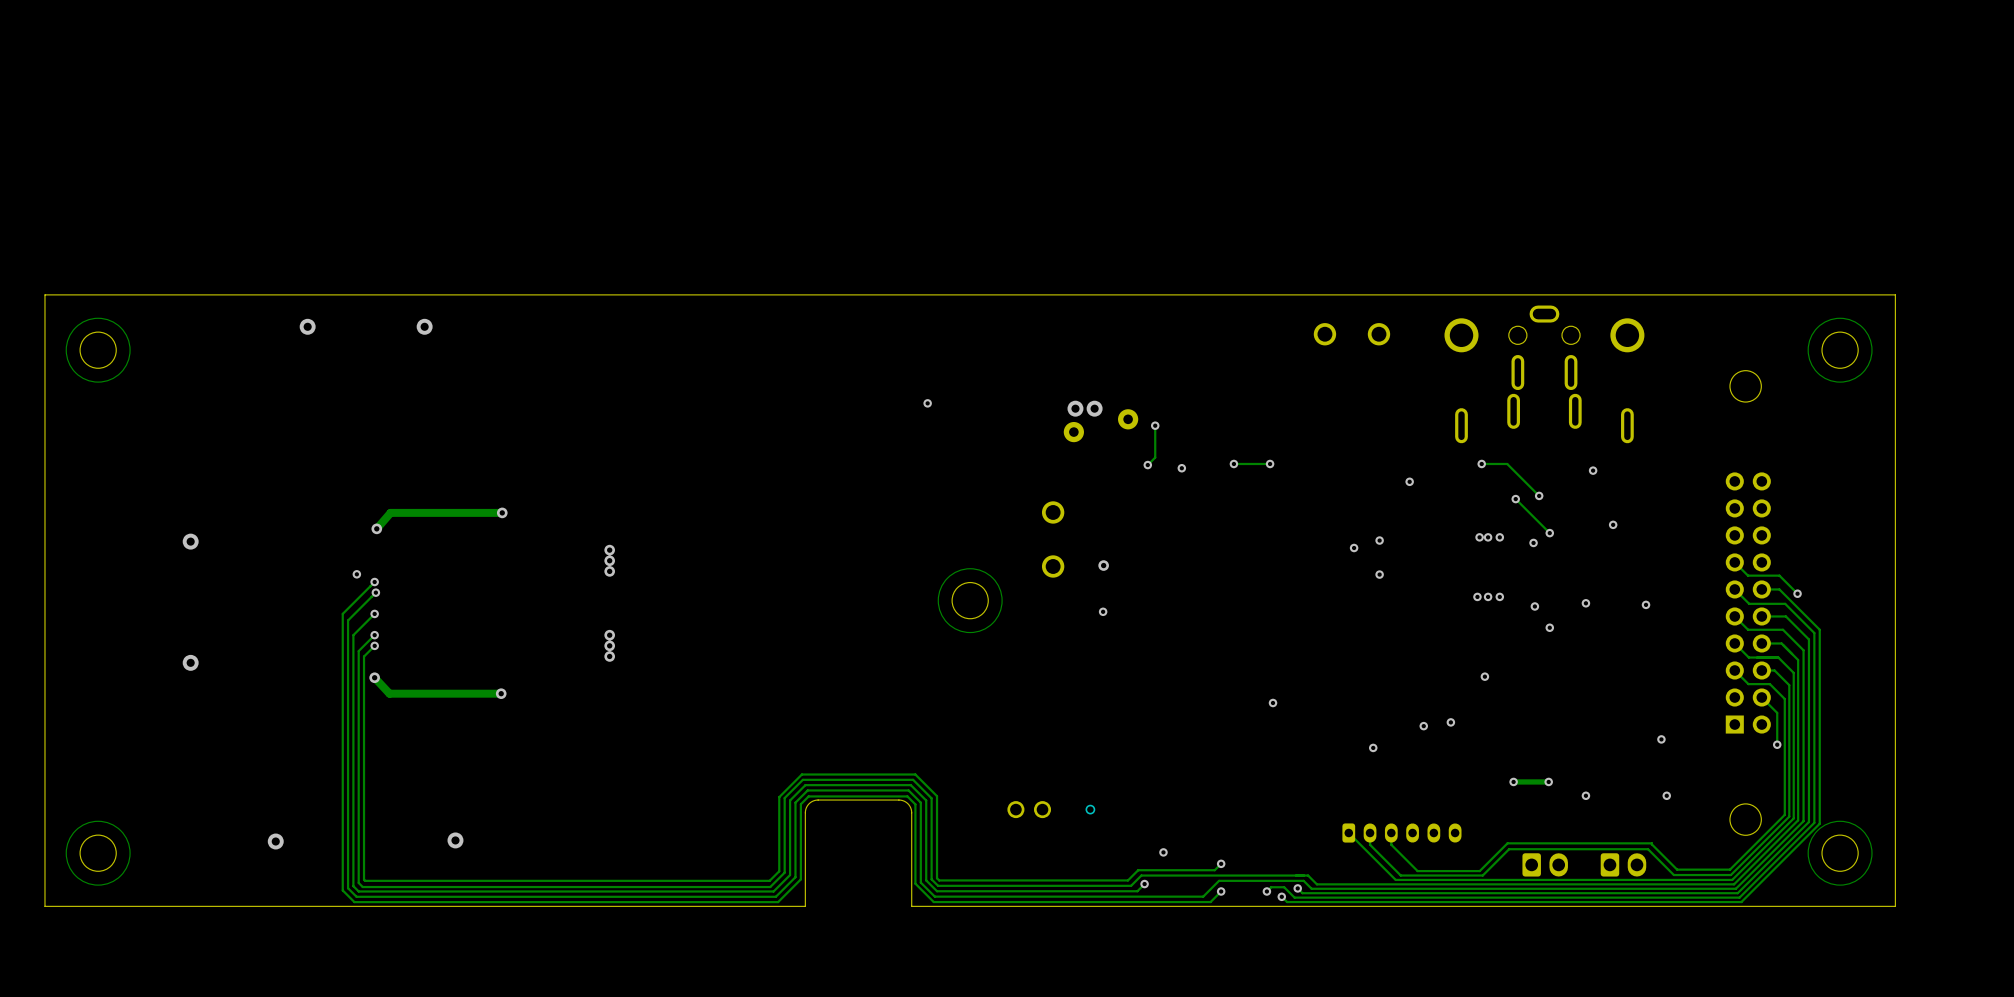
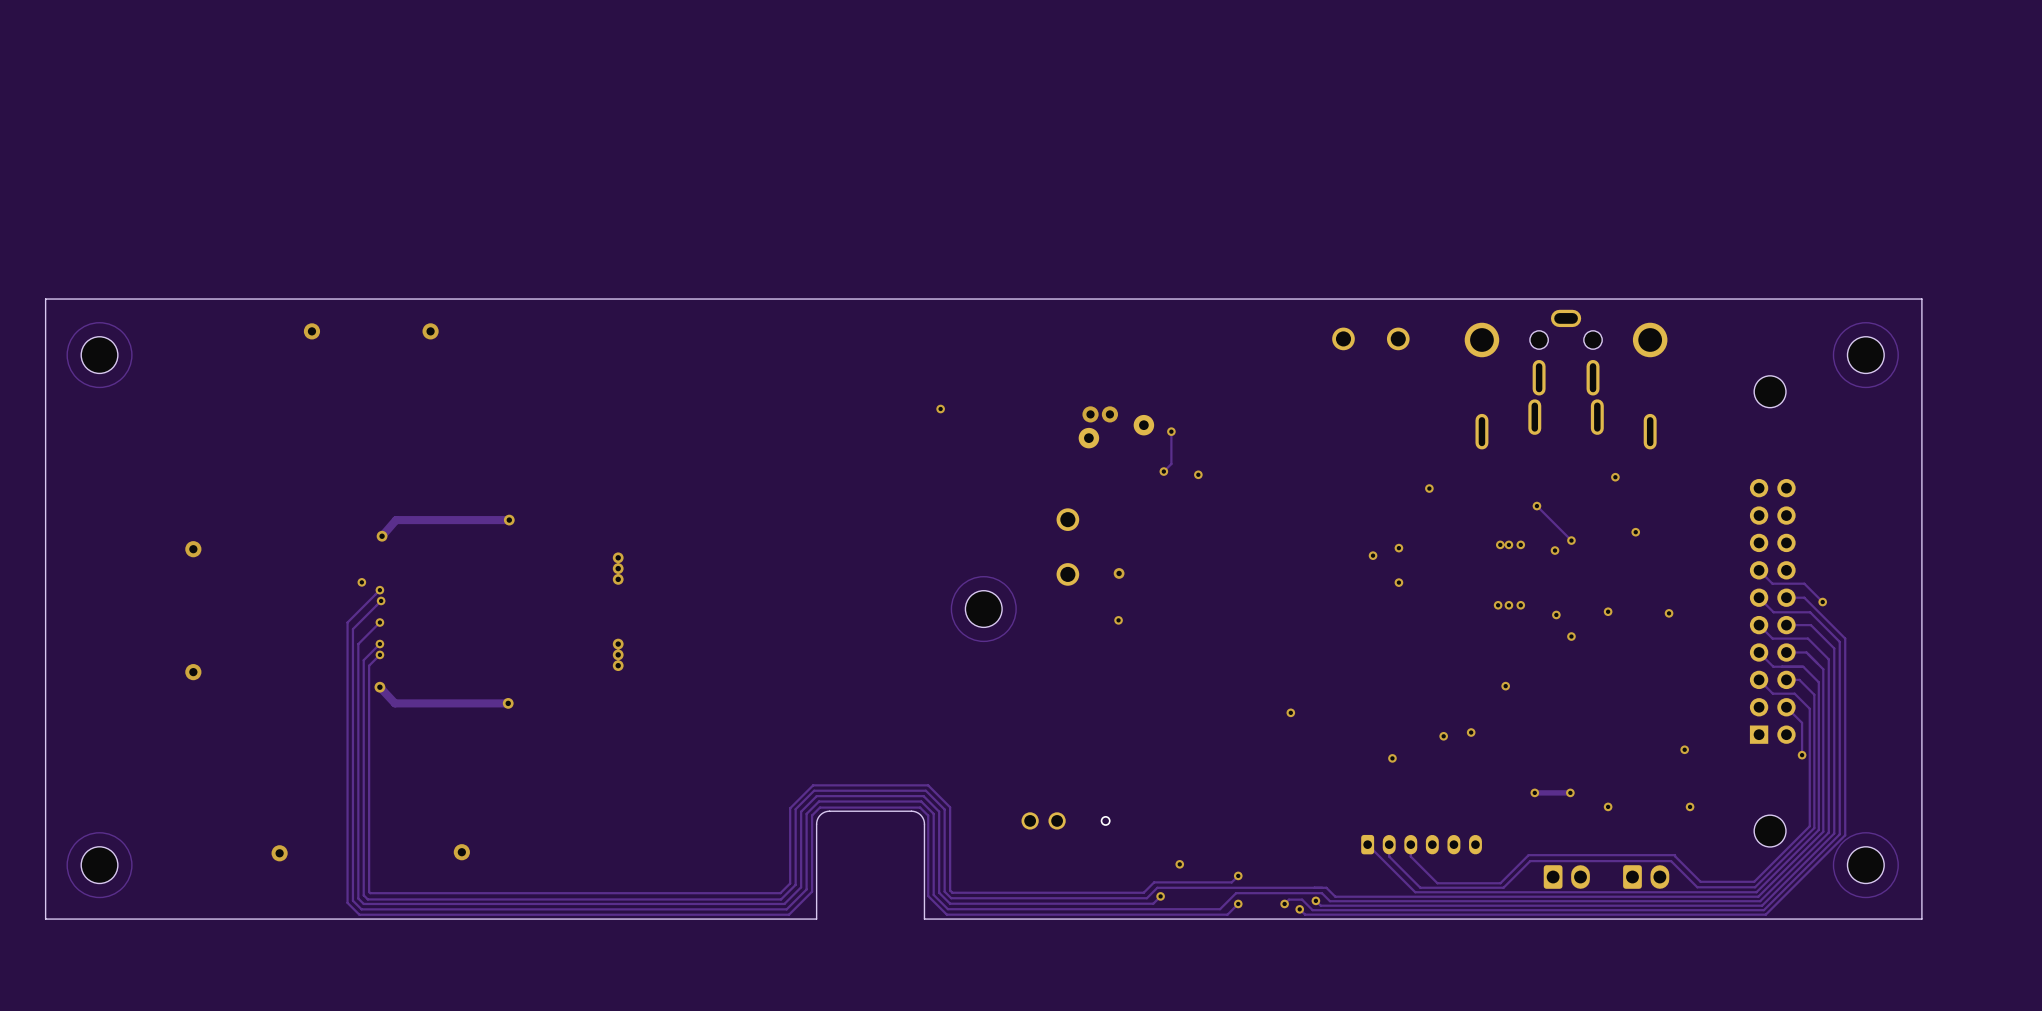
via: (1233, 463) -> none
track: (1270, 463) (1233, 463) -> none
via: (1270, 463) -> none
track: (1481, 463) (1507, 463) (1539, 495) -> none
via: (1481, 463) -> none
via: (1539, 495) -> none

